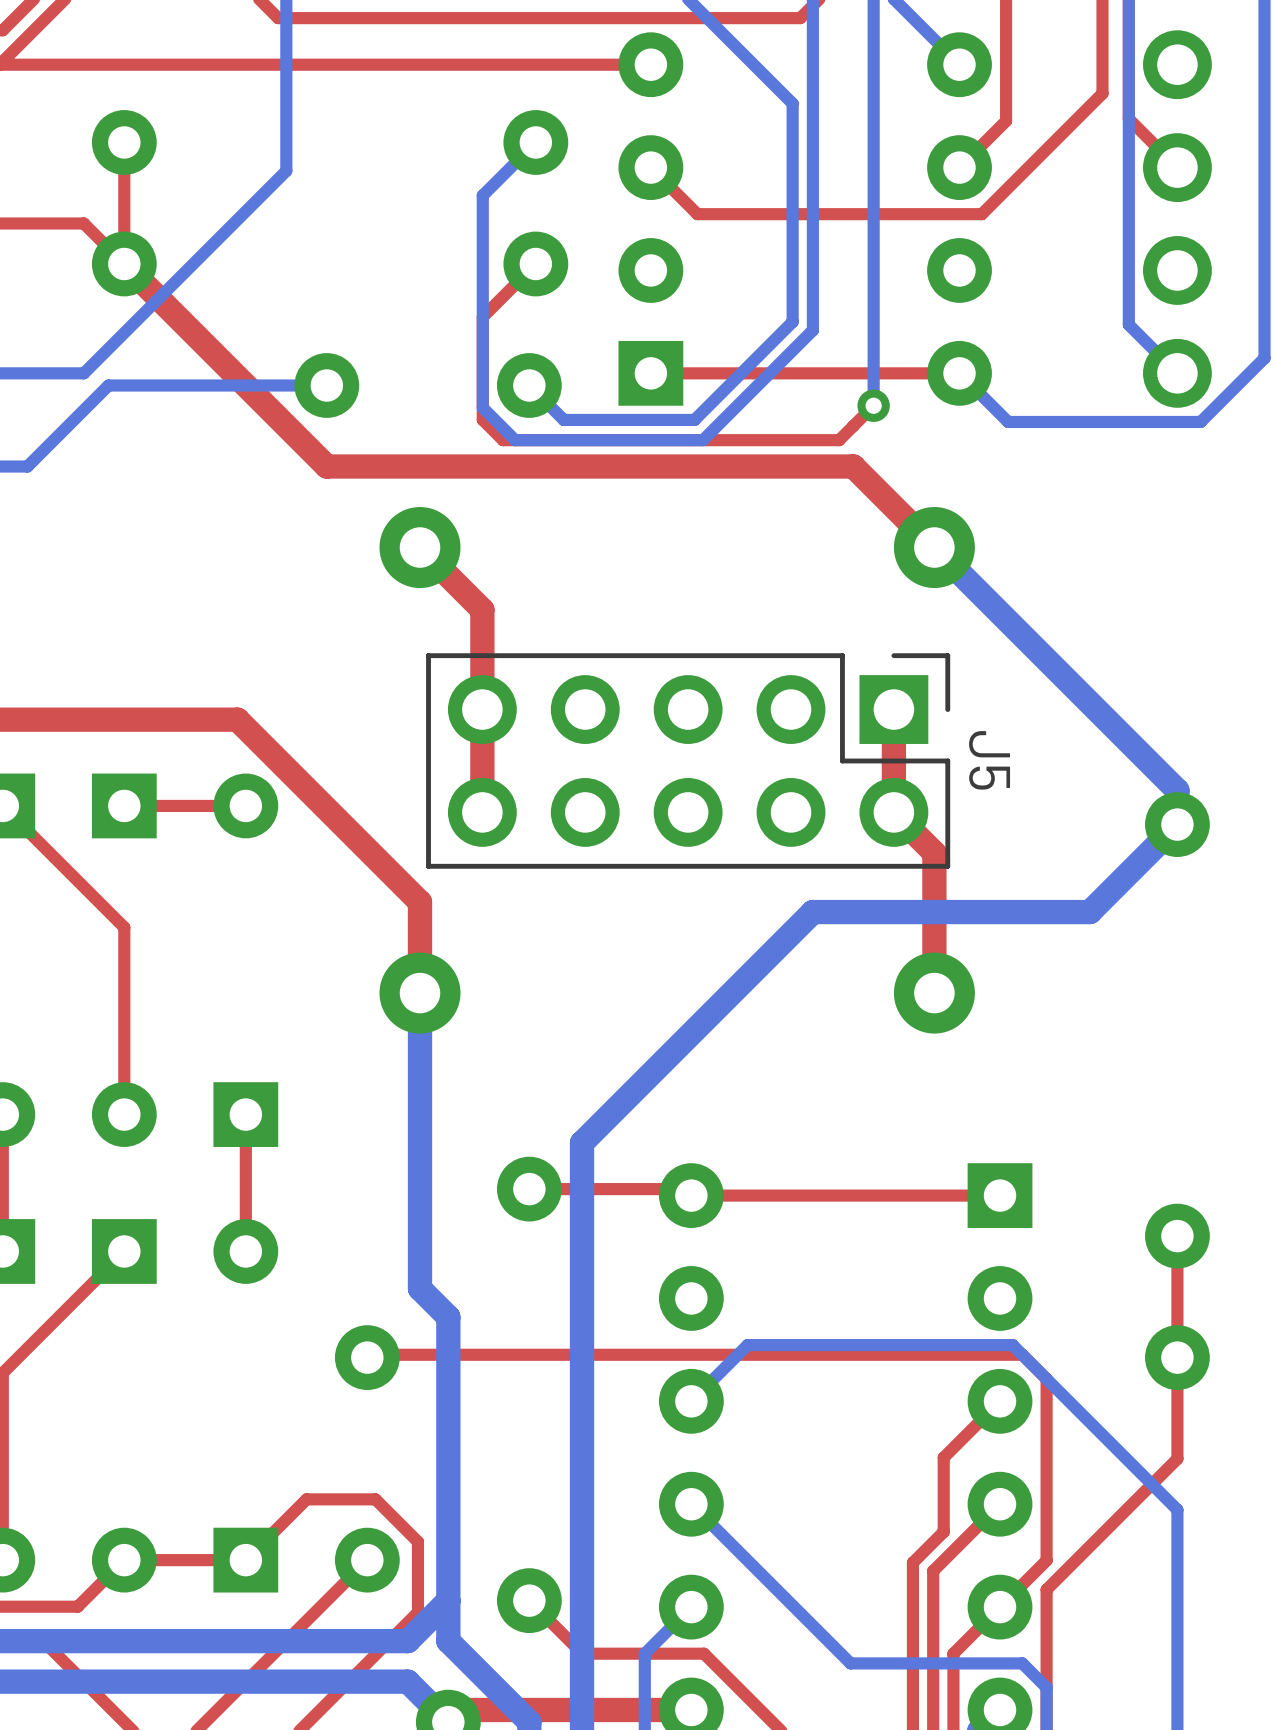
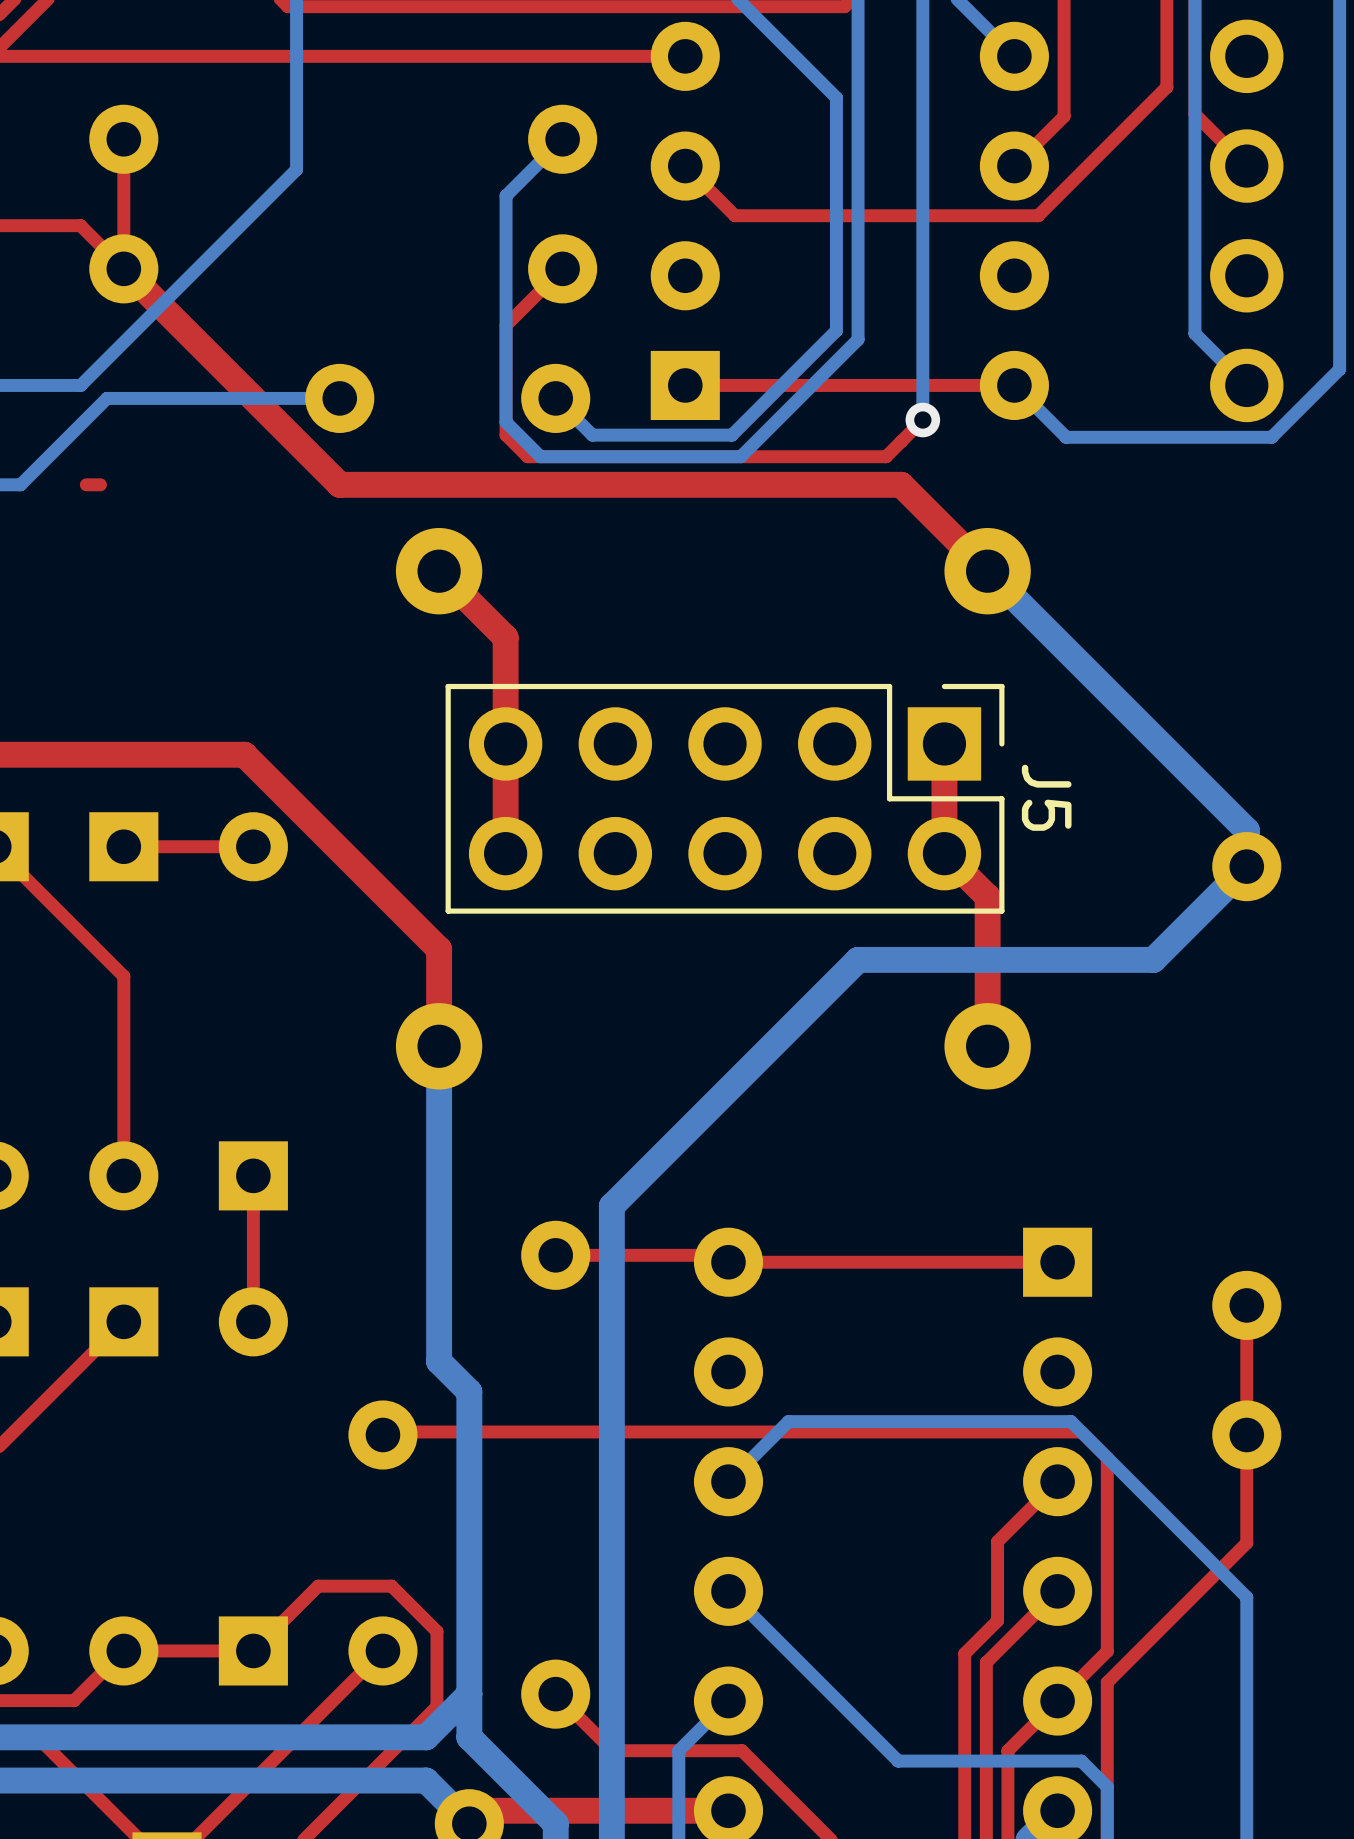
top track: none -> (100, 484) (86, 484)

